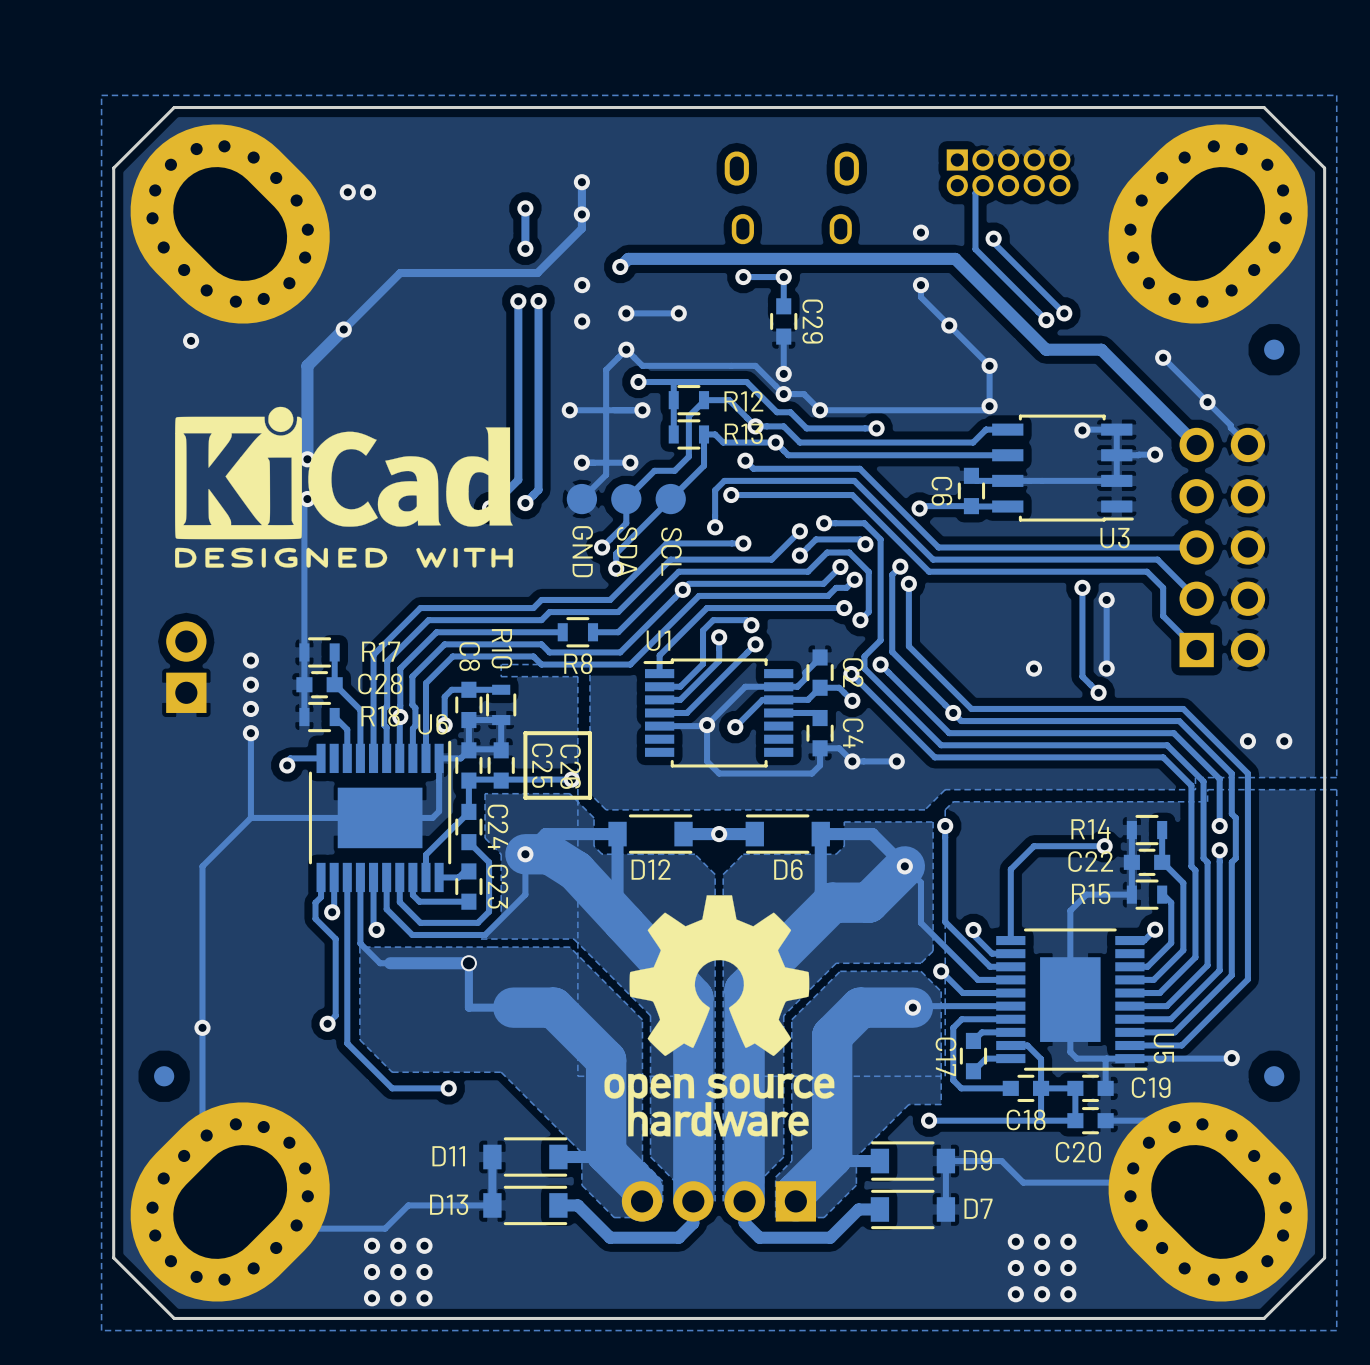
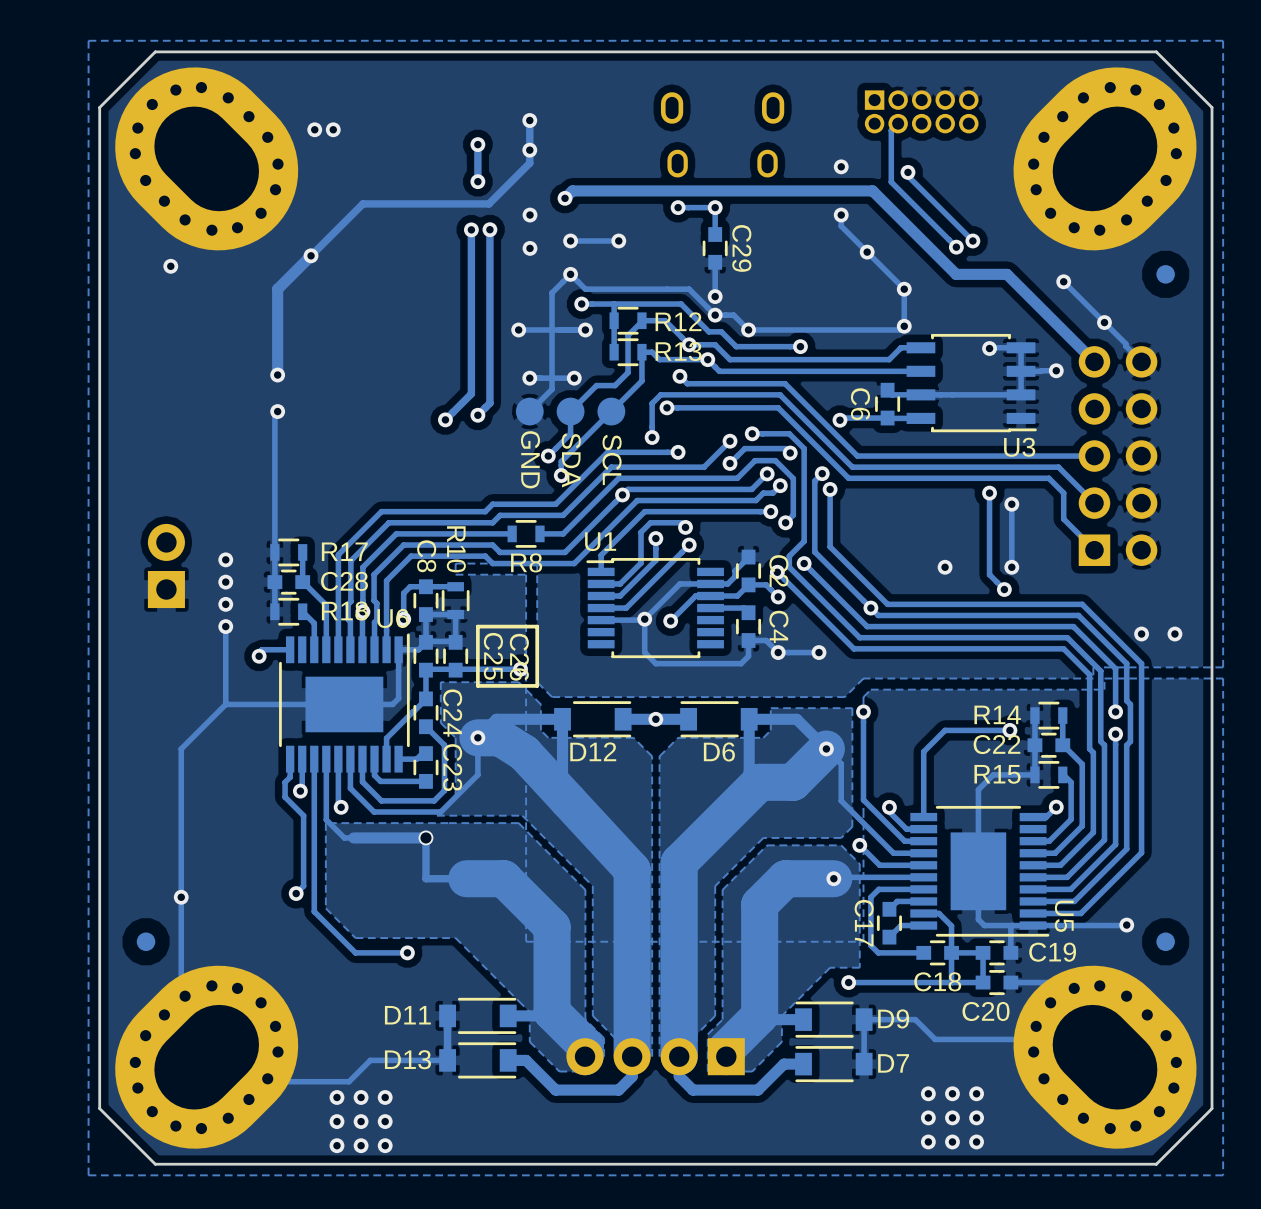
drawing: [175, 406, 513, 568] -> none
drawing: [604, 895, 835, 1137] -> none

